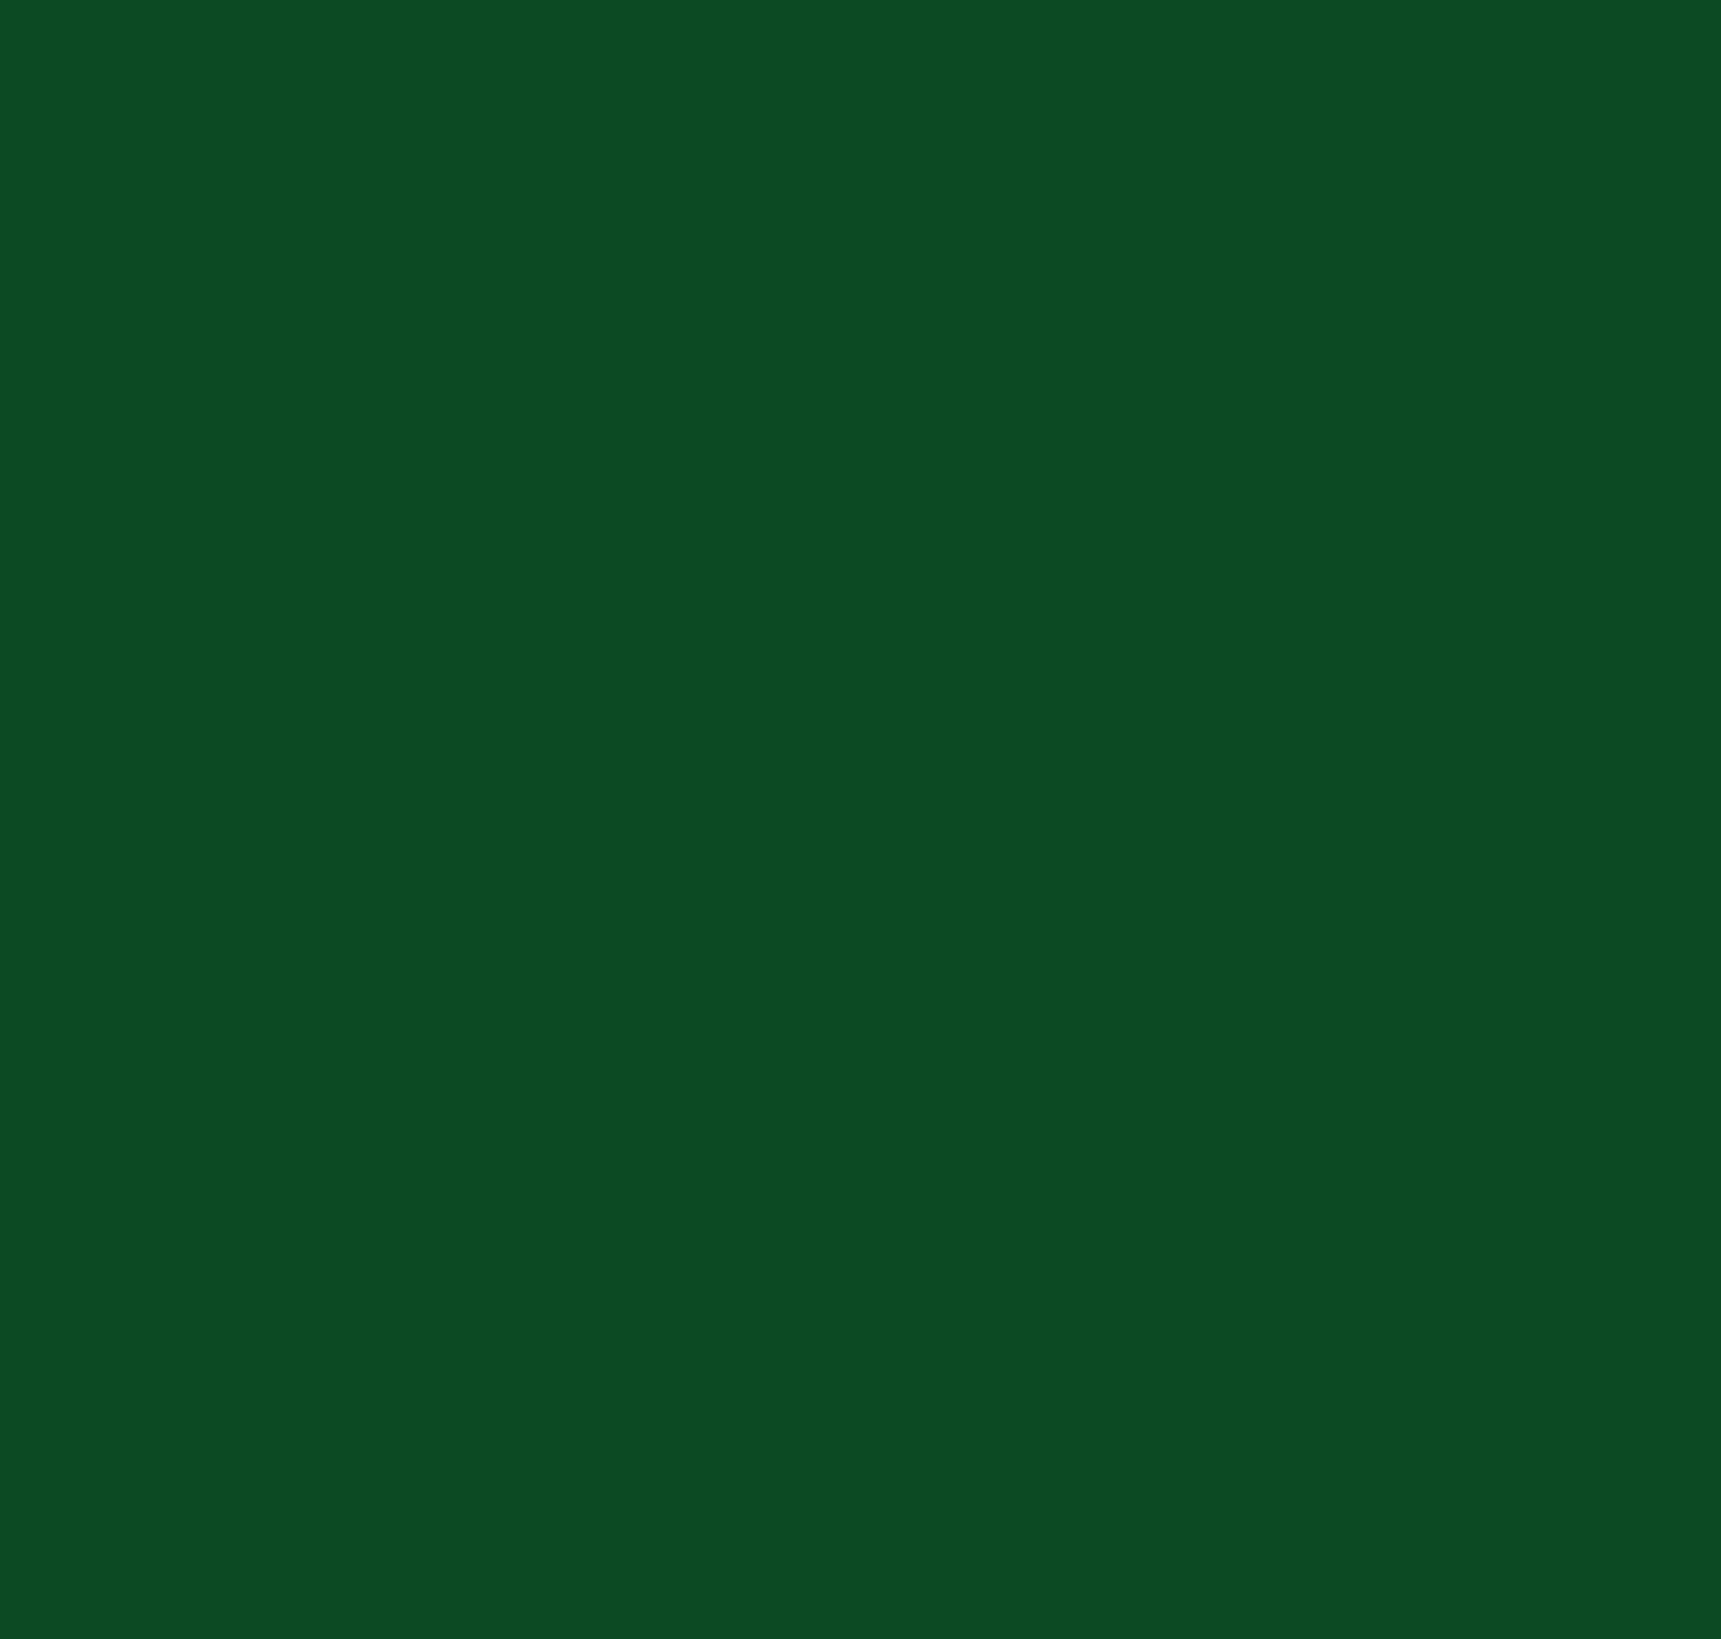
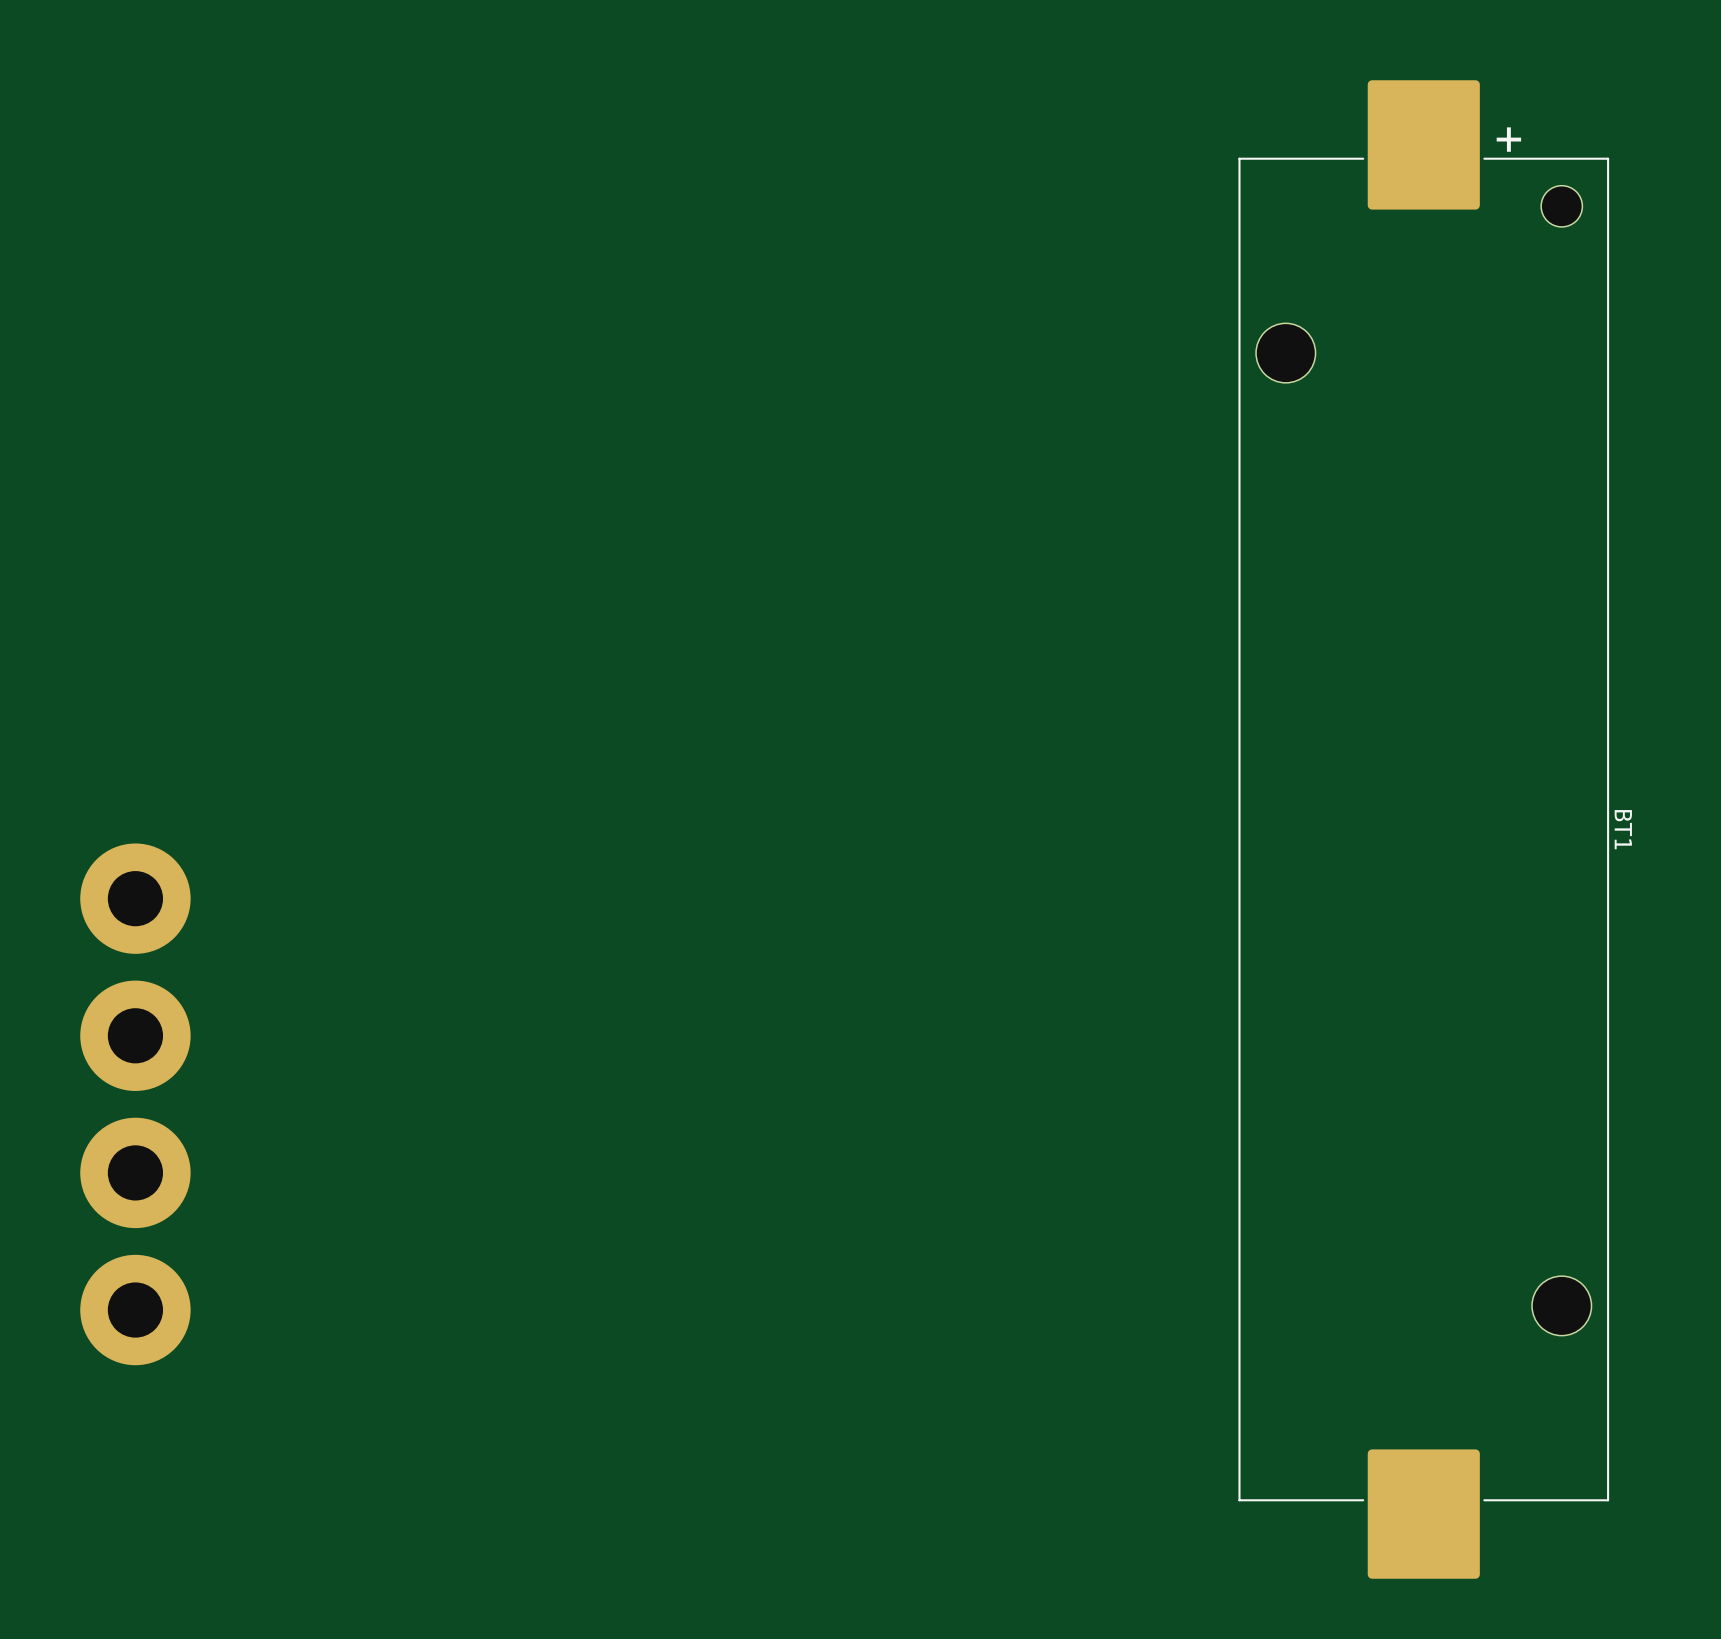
BT1: none -> (1423, 829)
part: none -> (135, 898)
part: none -> (135, 1035)
part: none -> (135, 1172)
part: none -> (135, 1310)

